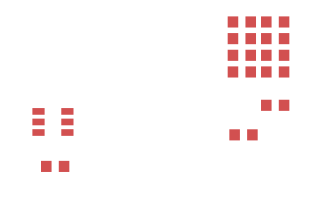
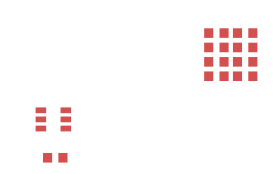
part: (275, 105) -> none
part: (243, 134) -> none

